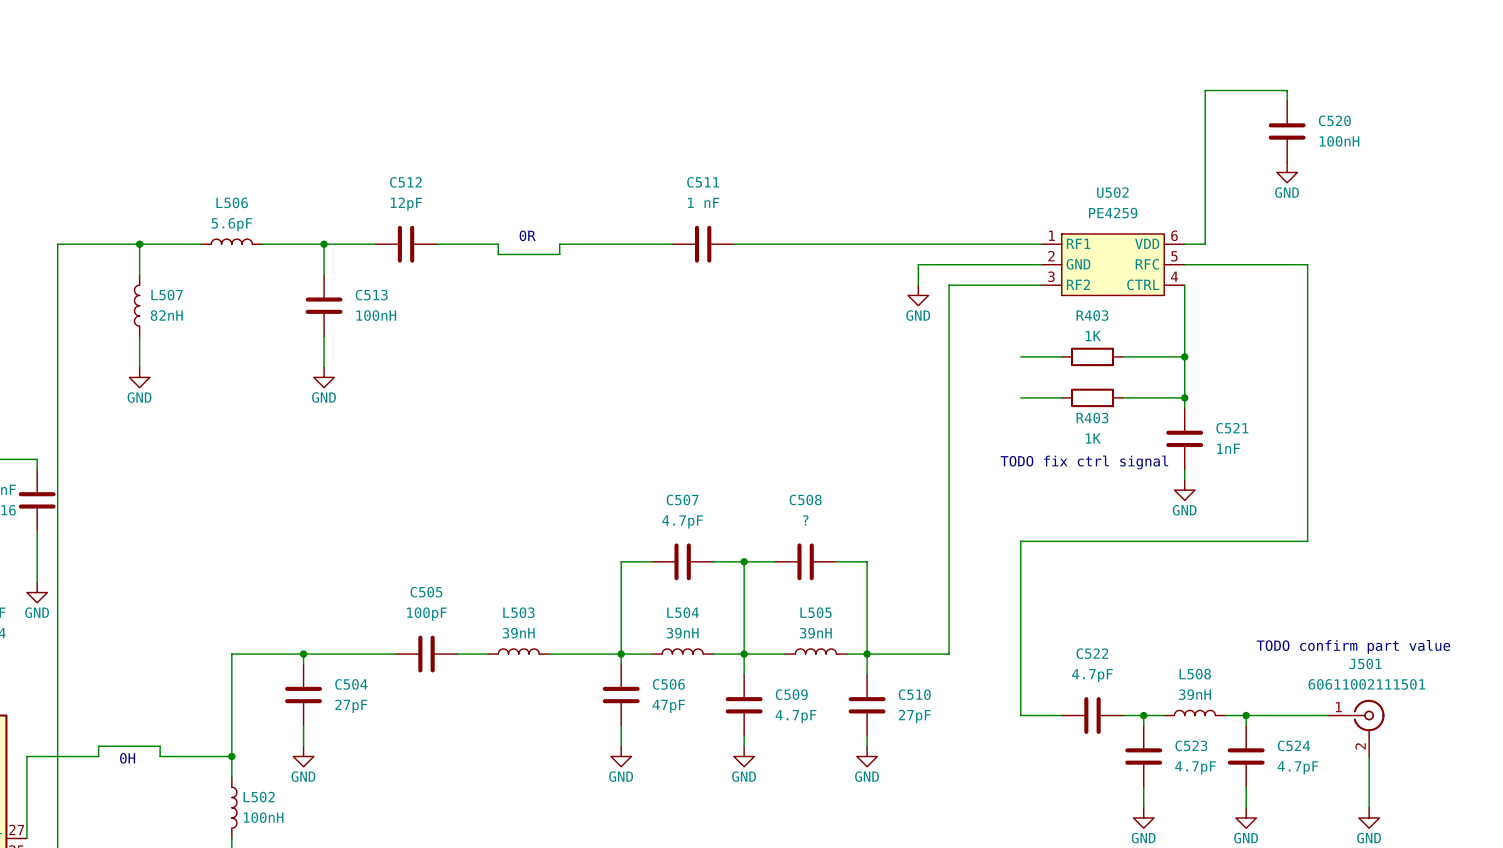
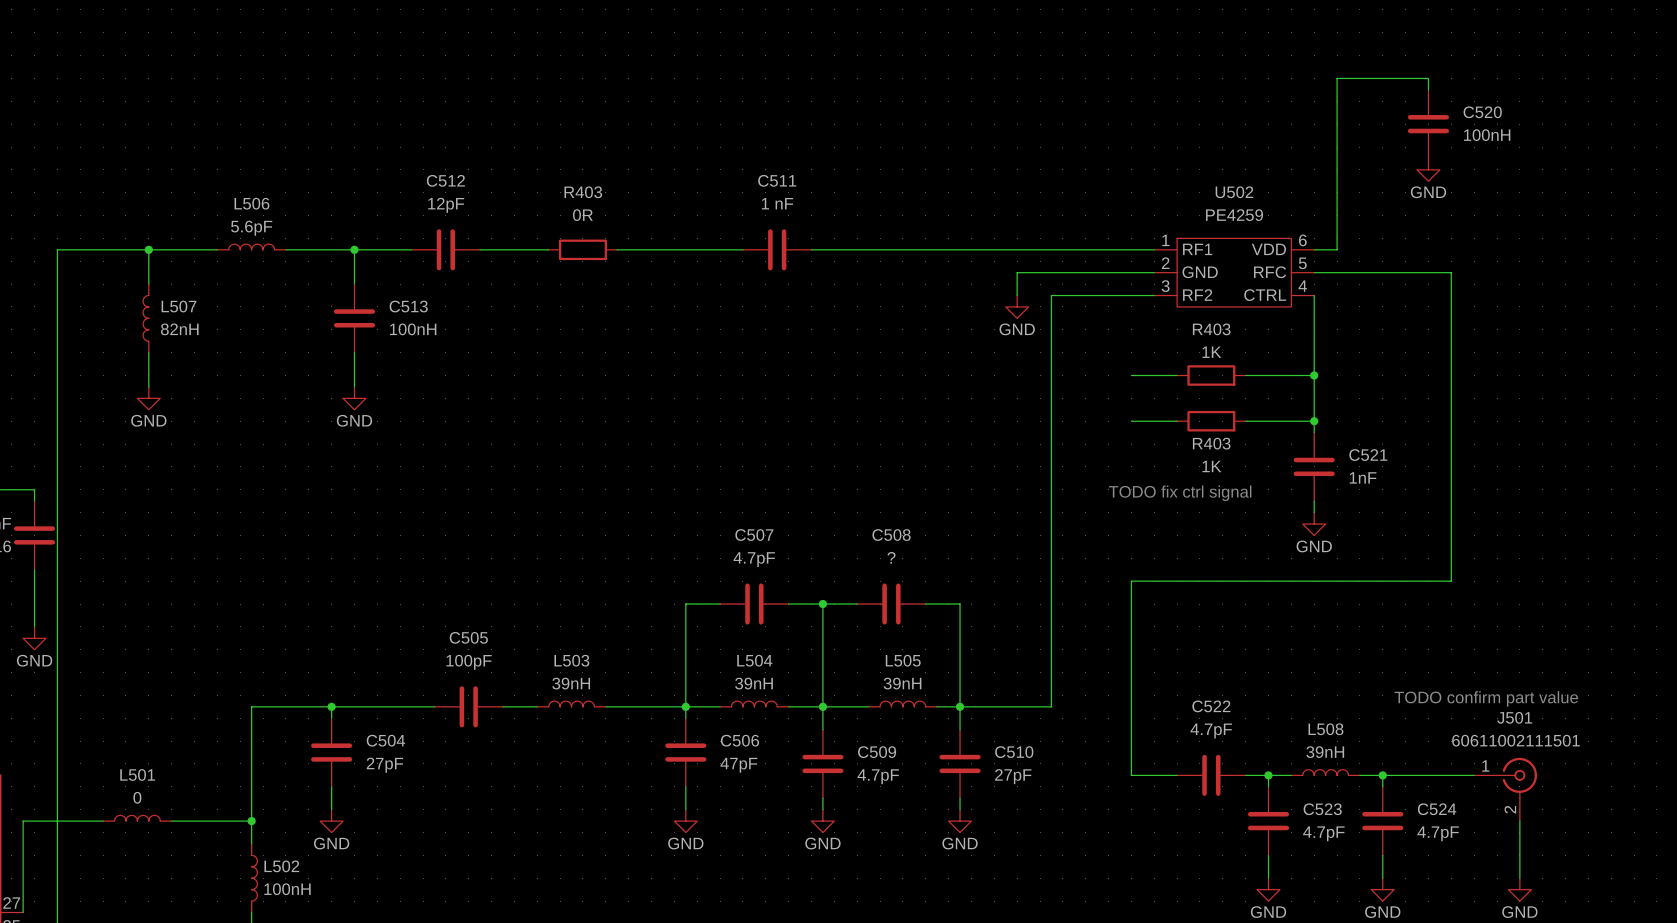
text: 0R (527, 235) -> none
wire: (498, 244) (498, 254) (559, 254) (559, 244) -> none
R403: none -> 0R (582, 249)
L501: none -> 0 (137, 818)
wire: (98, 756) (98, 746) (160, 746) (160, 756) -> none
text: 0H (127, 758) -> none

